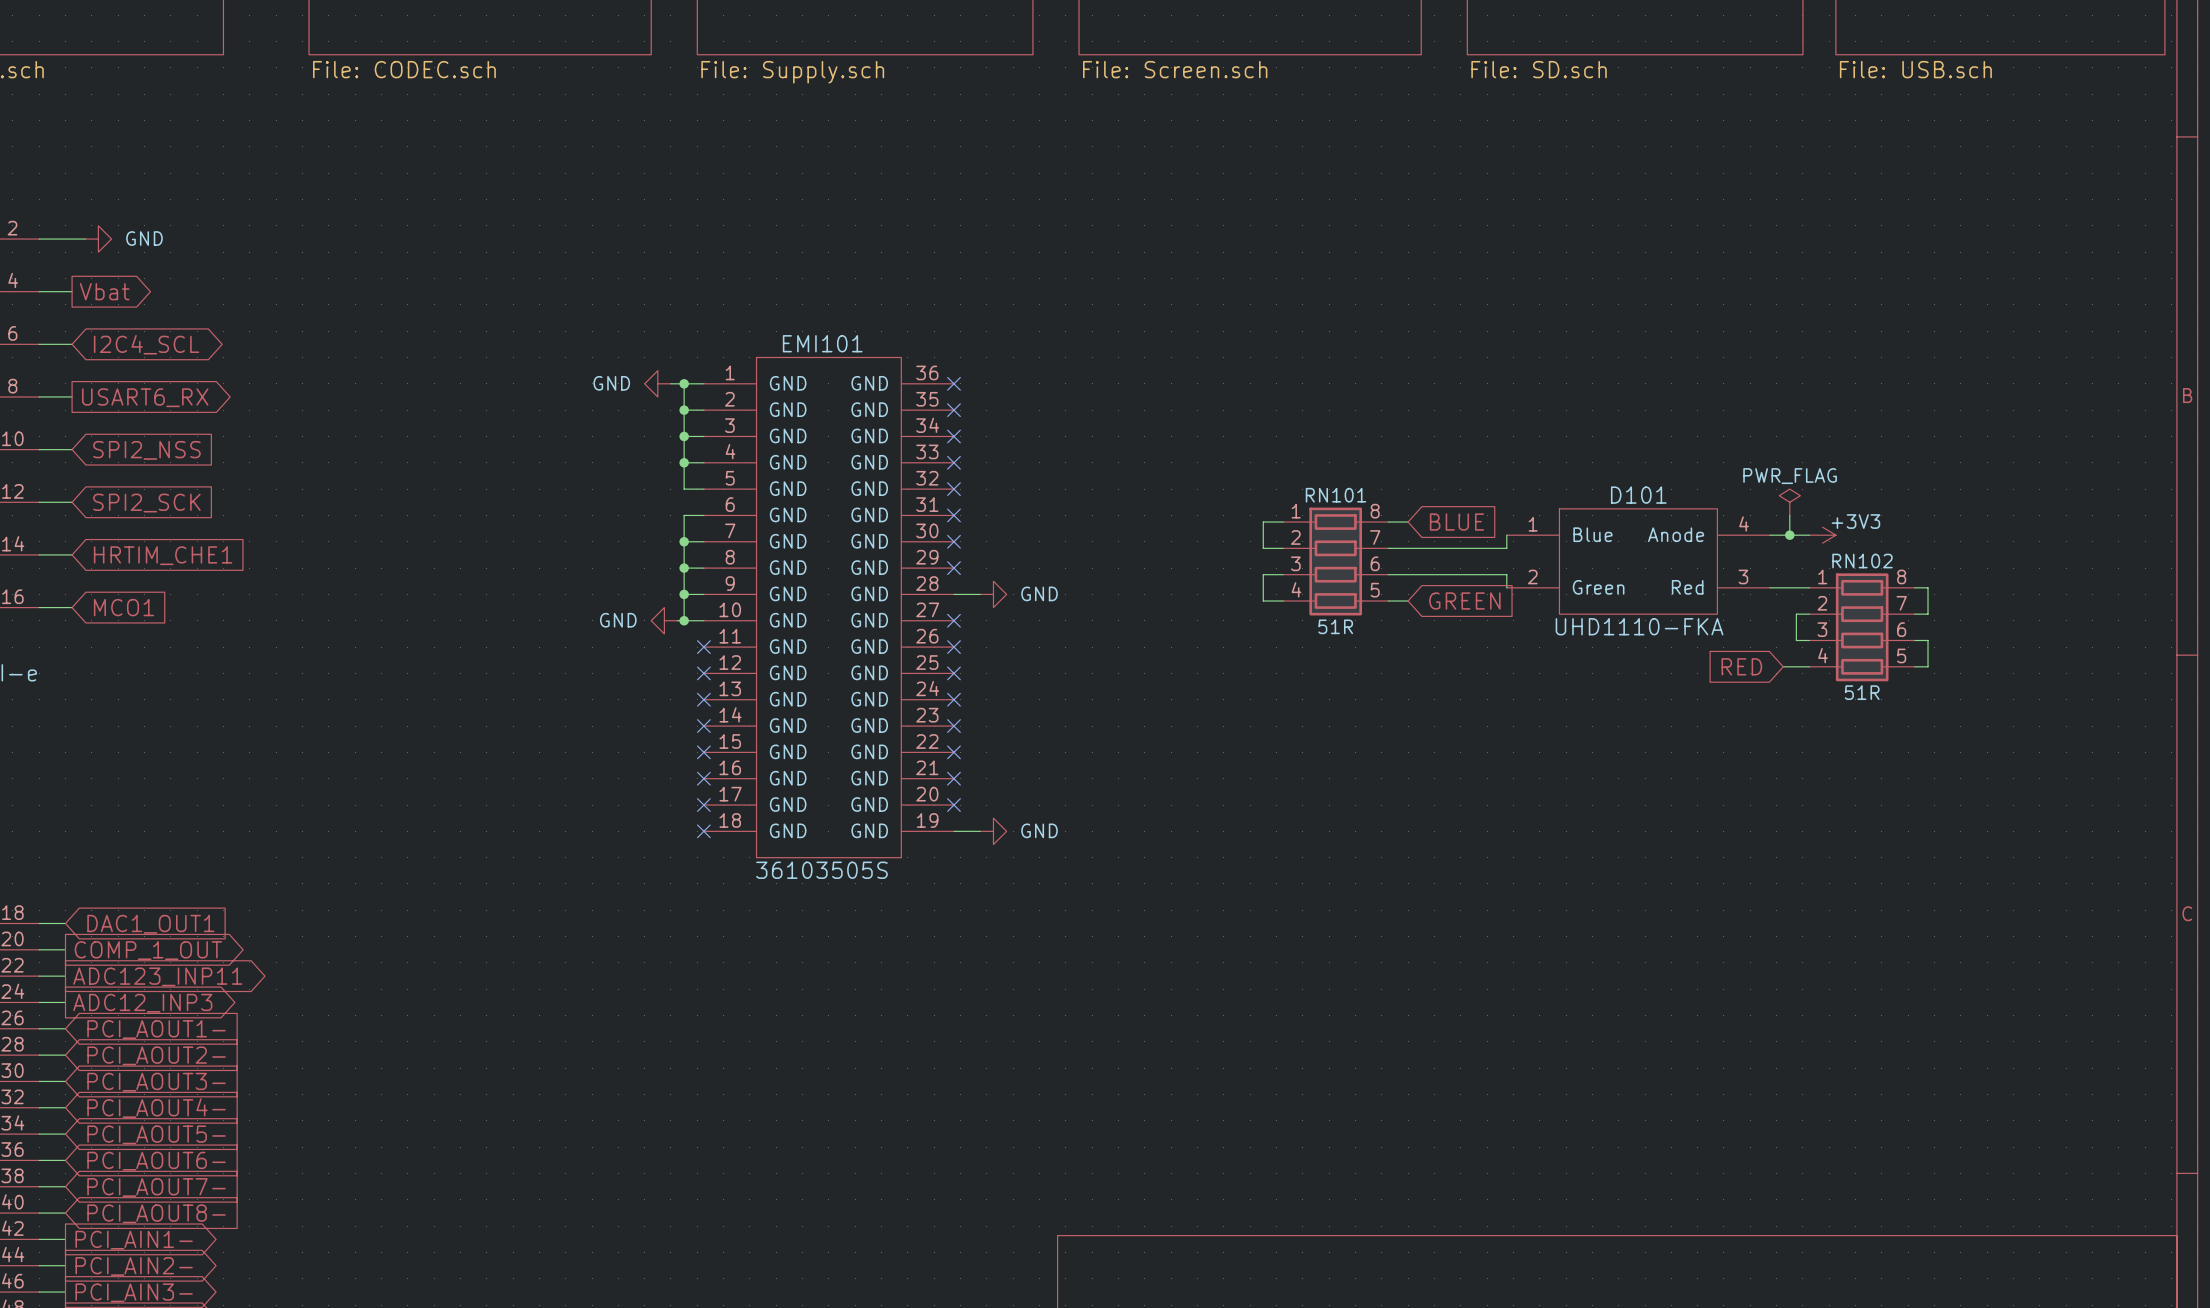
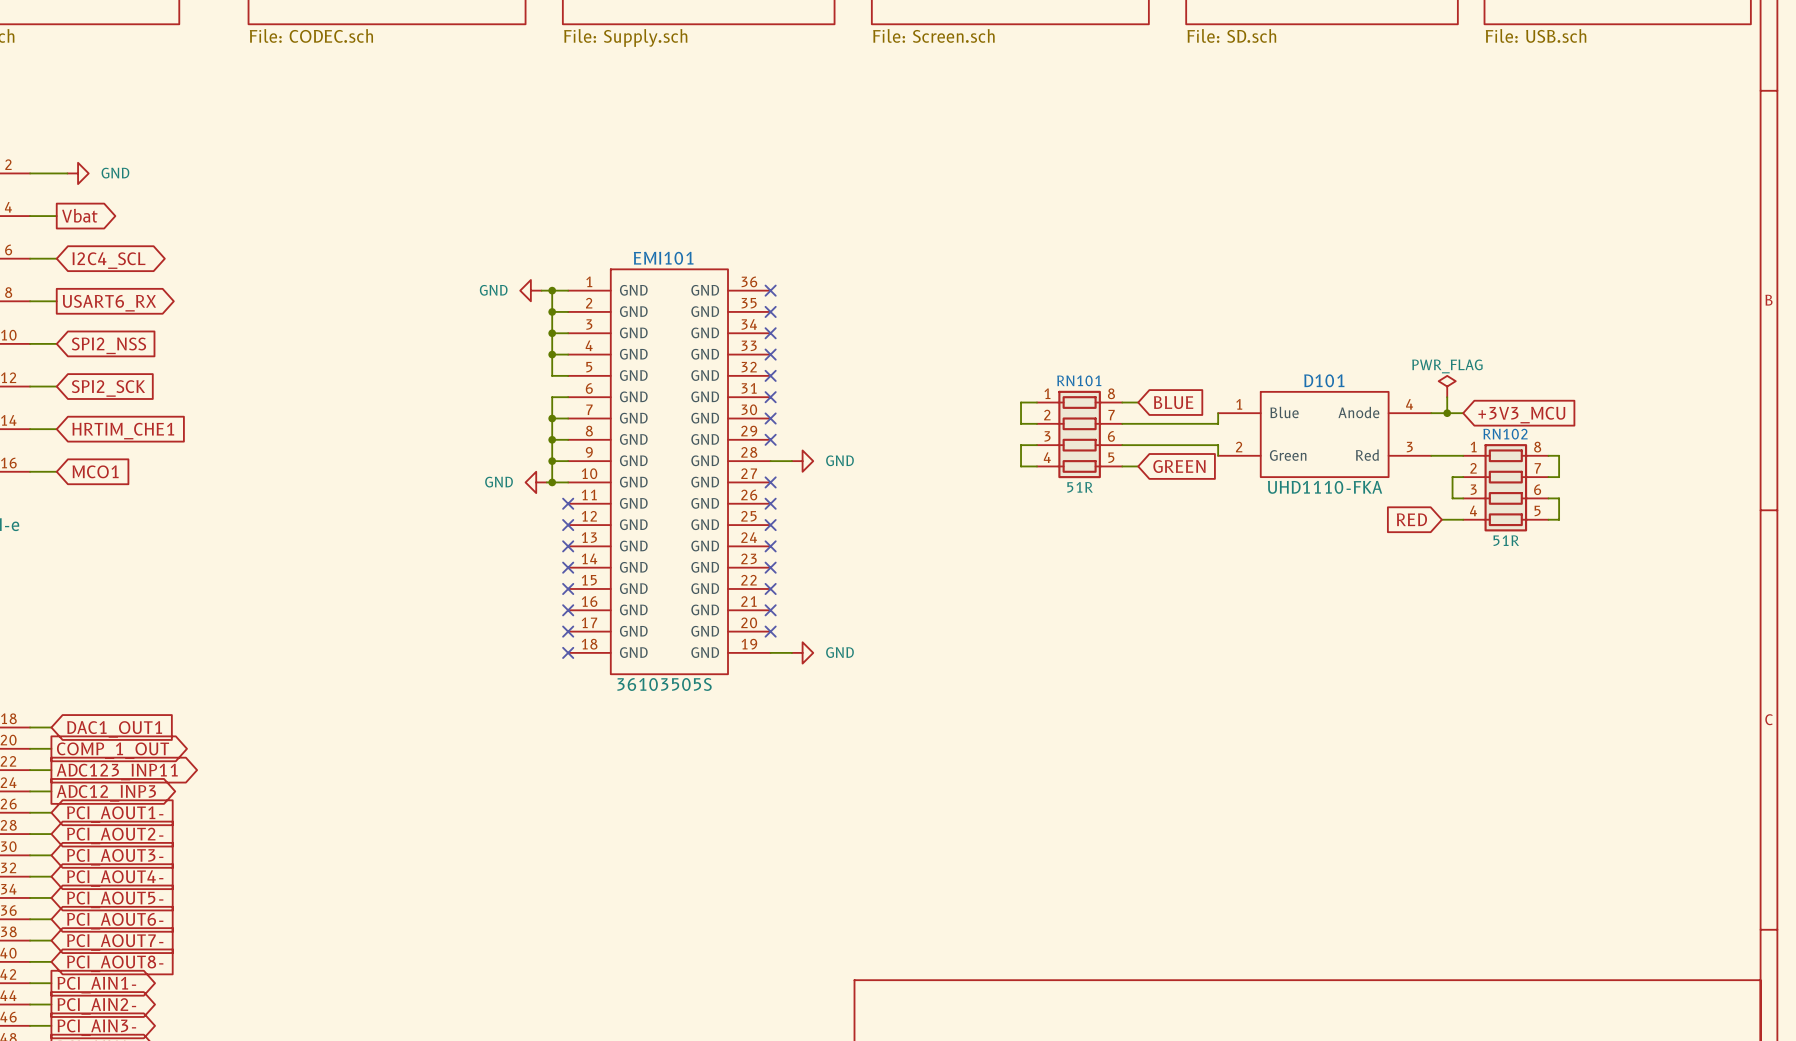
power symbol: +3V3 (1822, 535) -> none
global label: none -> +3V3_MCU (1521, 415)

